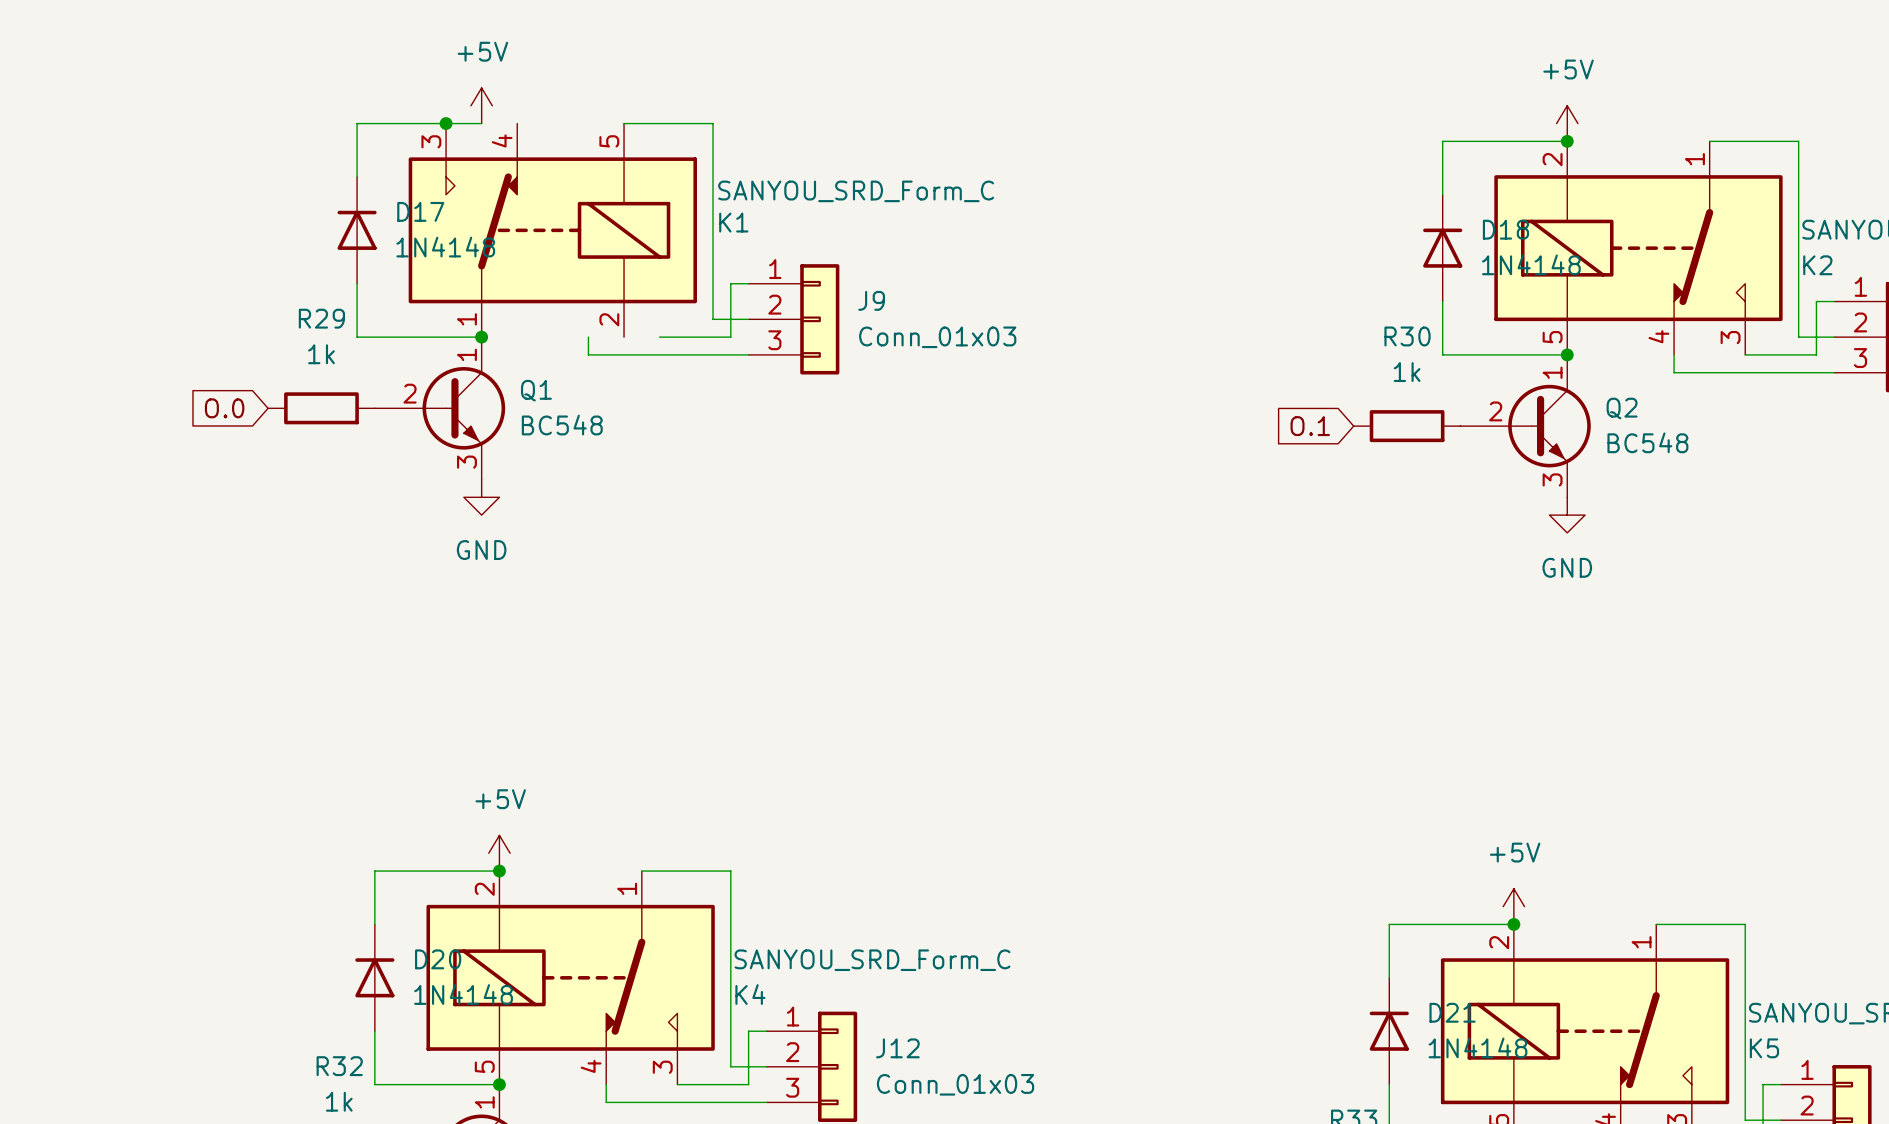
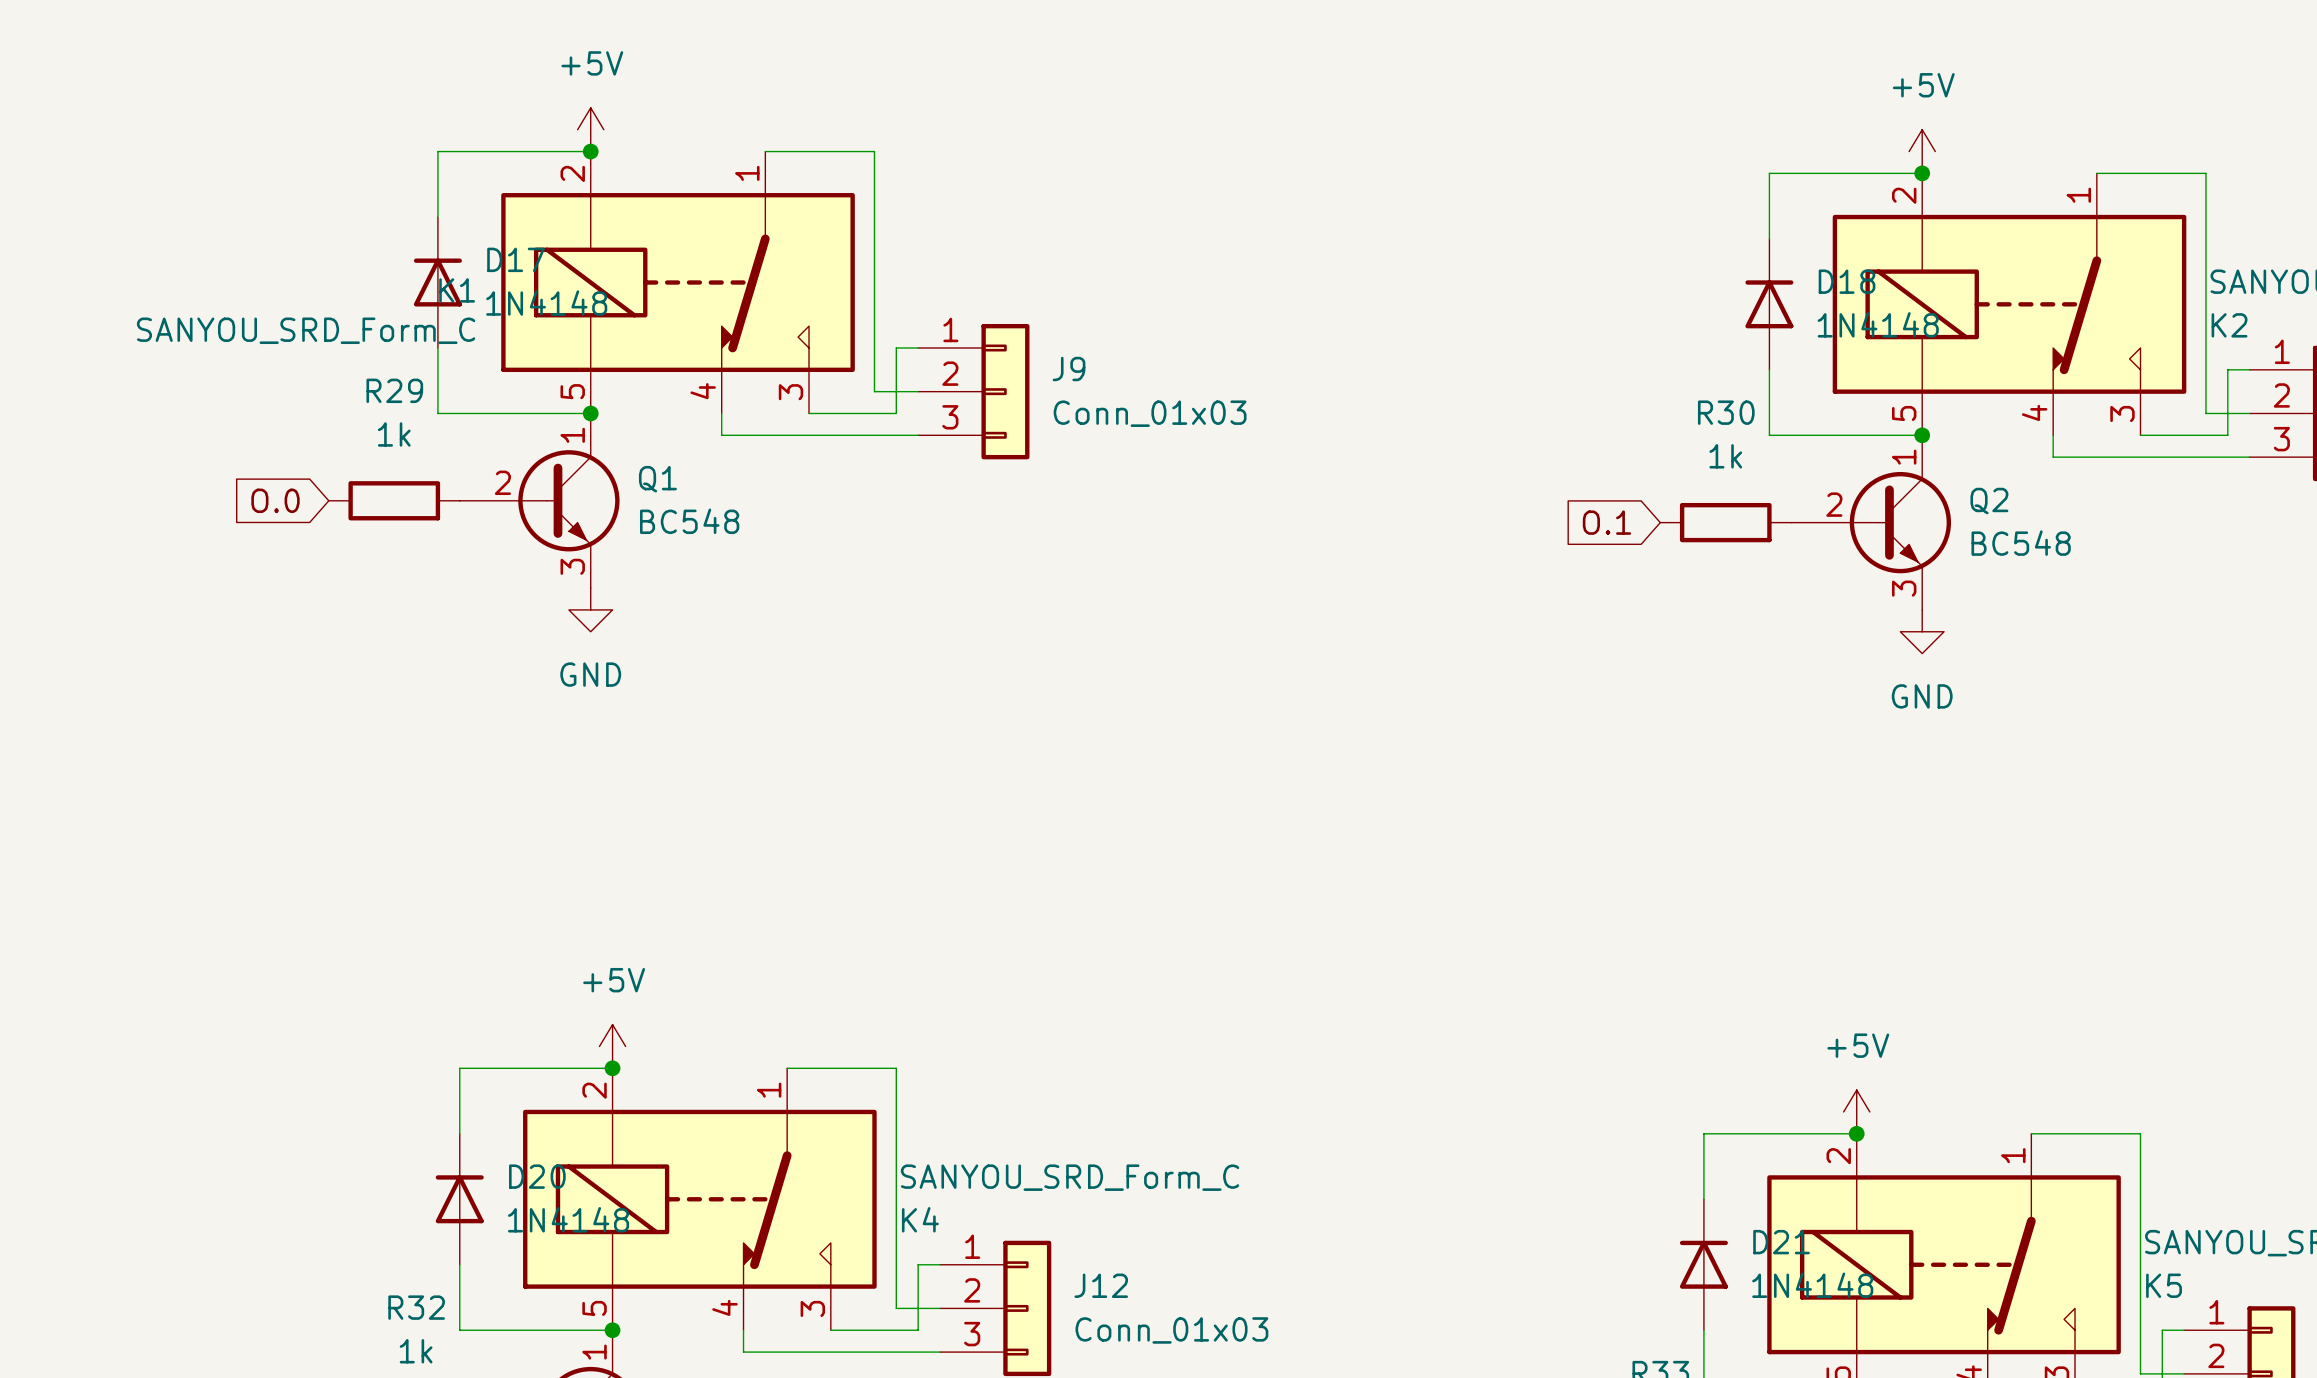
junction position: (446, 123) -> (590, 151)
K1 rotation: 0° (552, 230) -> 180° (678, 282)

